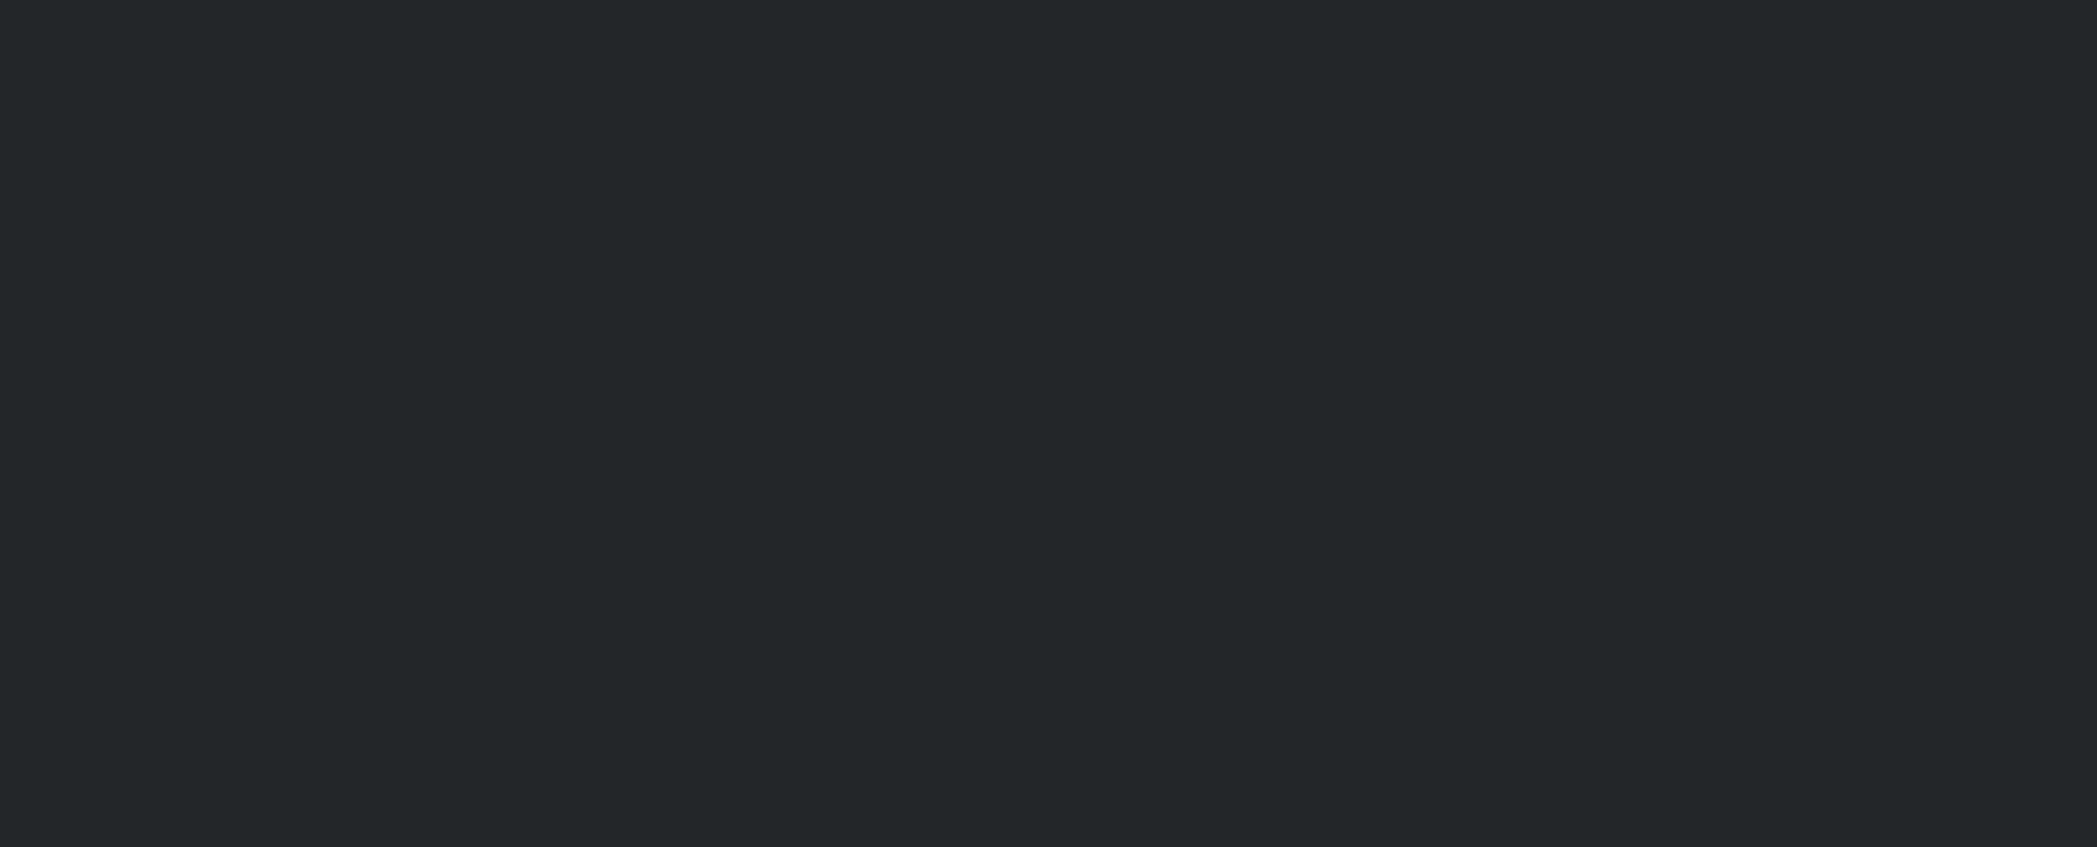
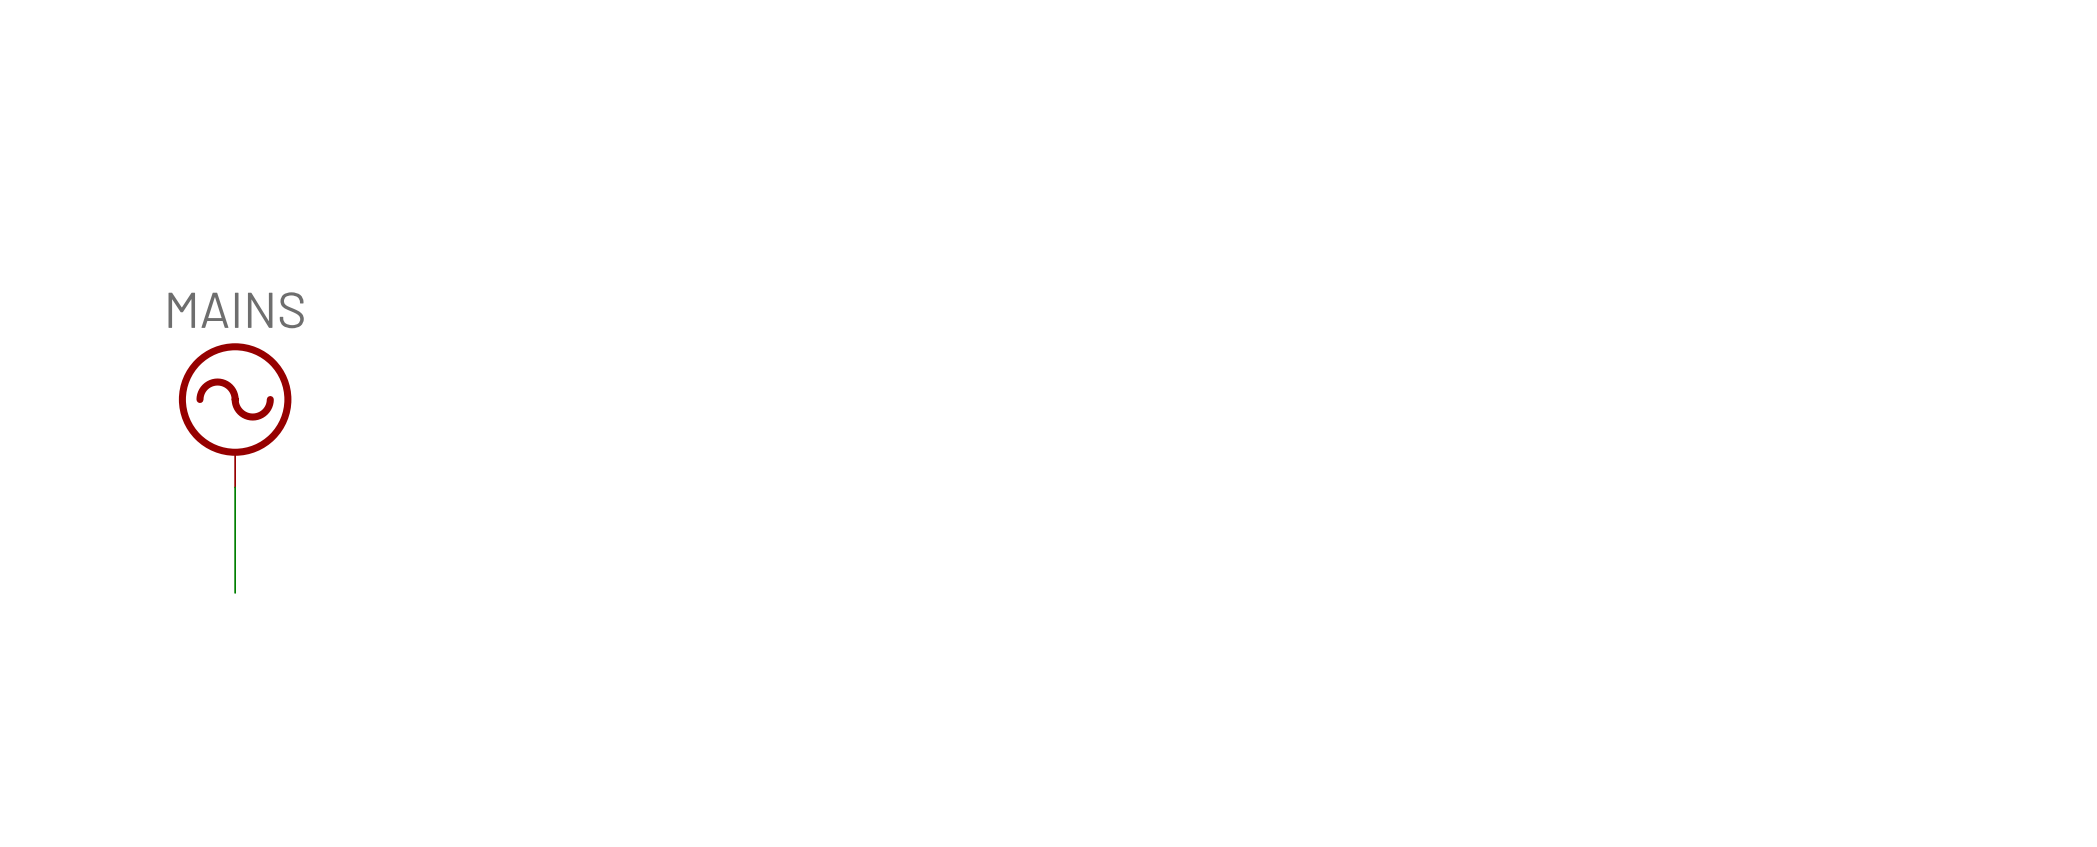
power symbol: none -> MAINS (235, 415)
wire: none -> (235, 487) (235, 592)

